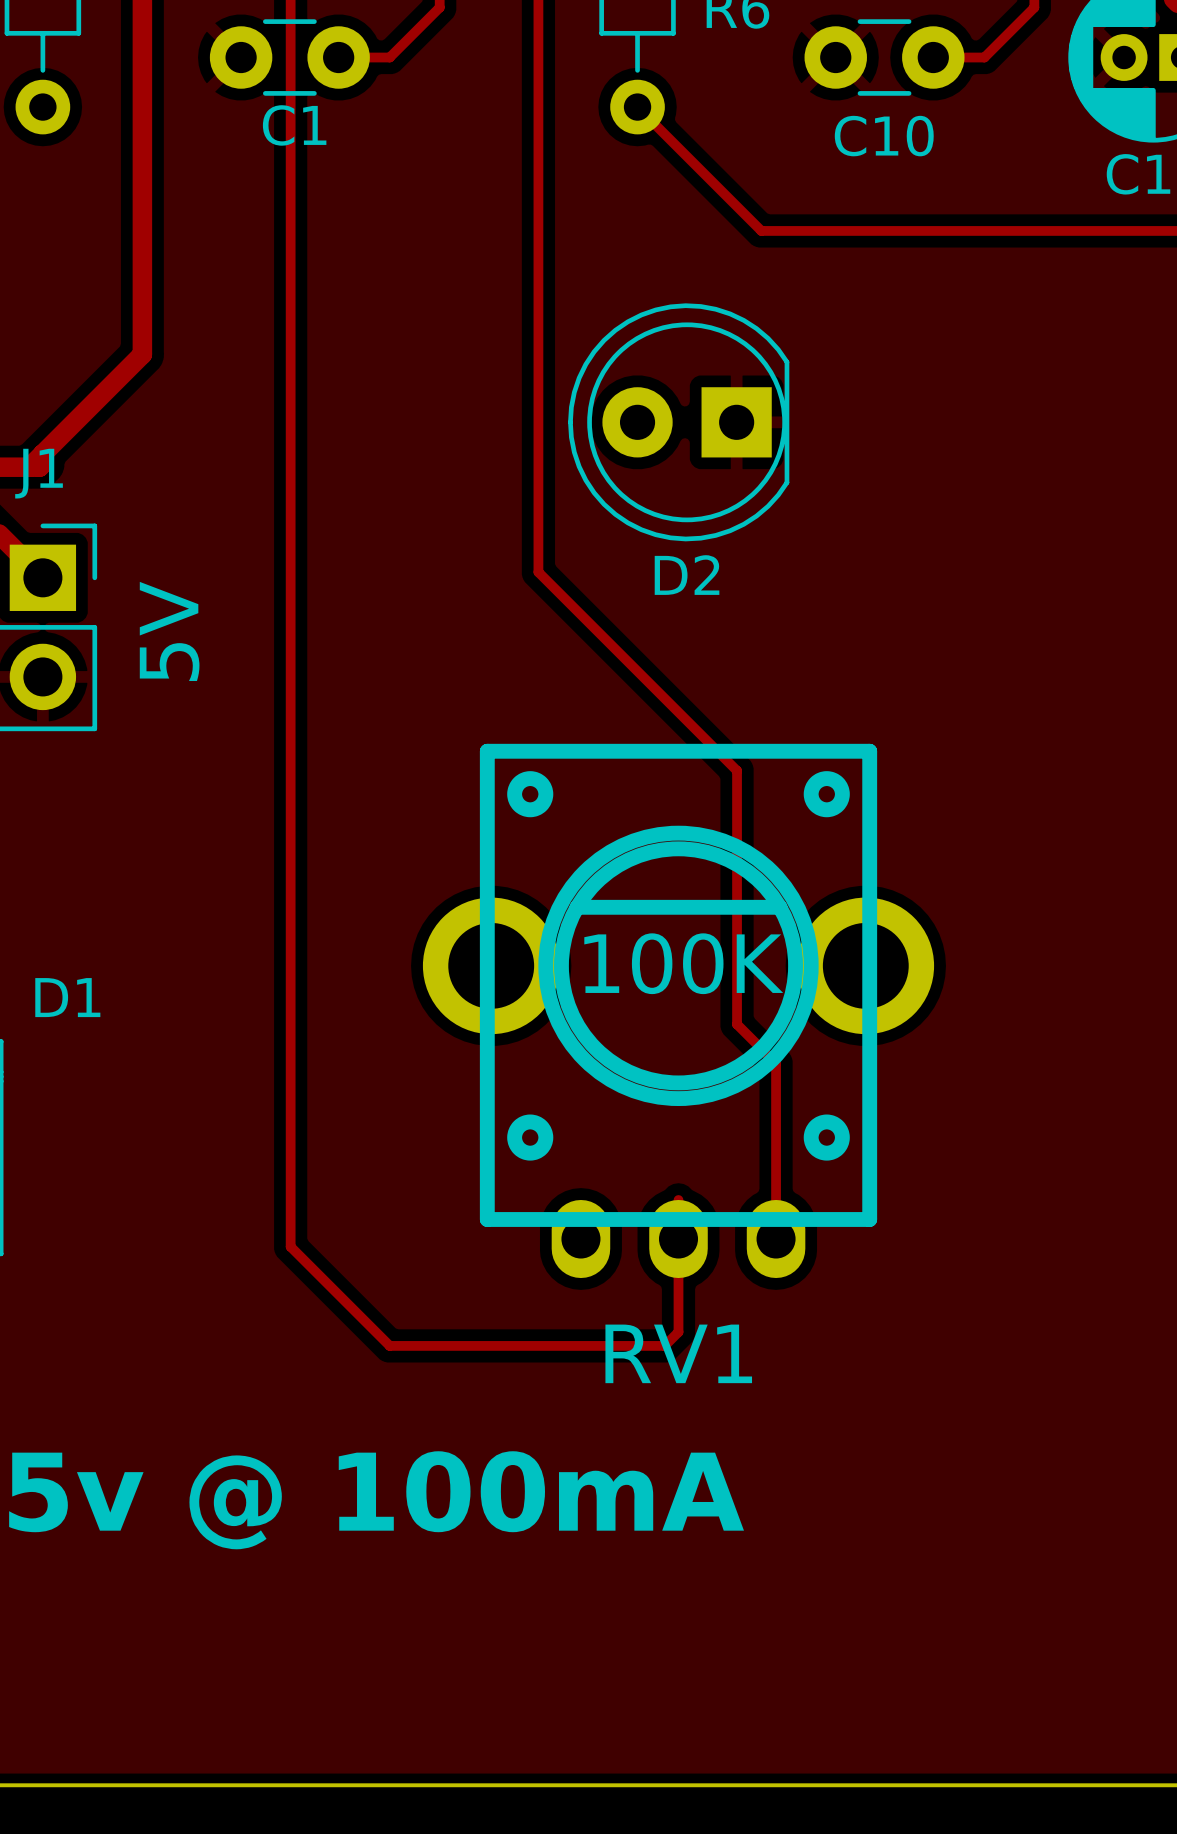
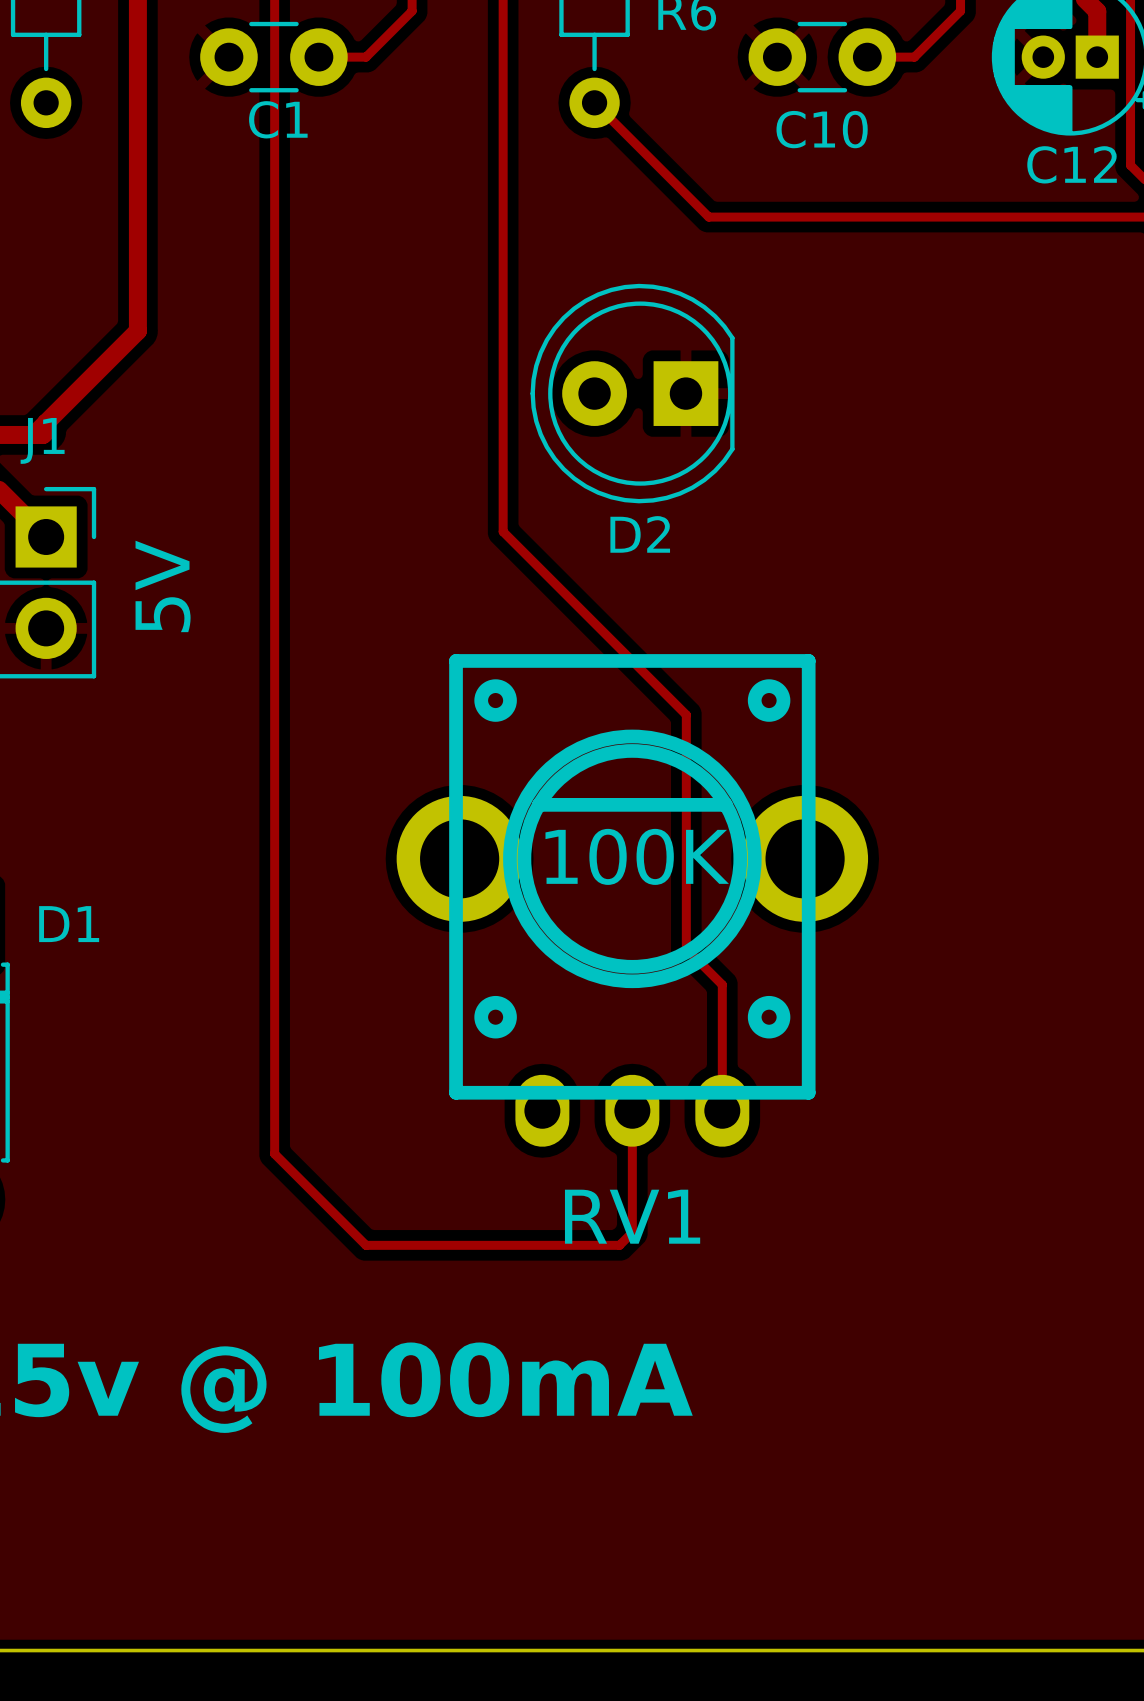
RV1 position: (678, 1010) -> (632, 900)

